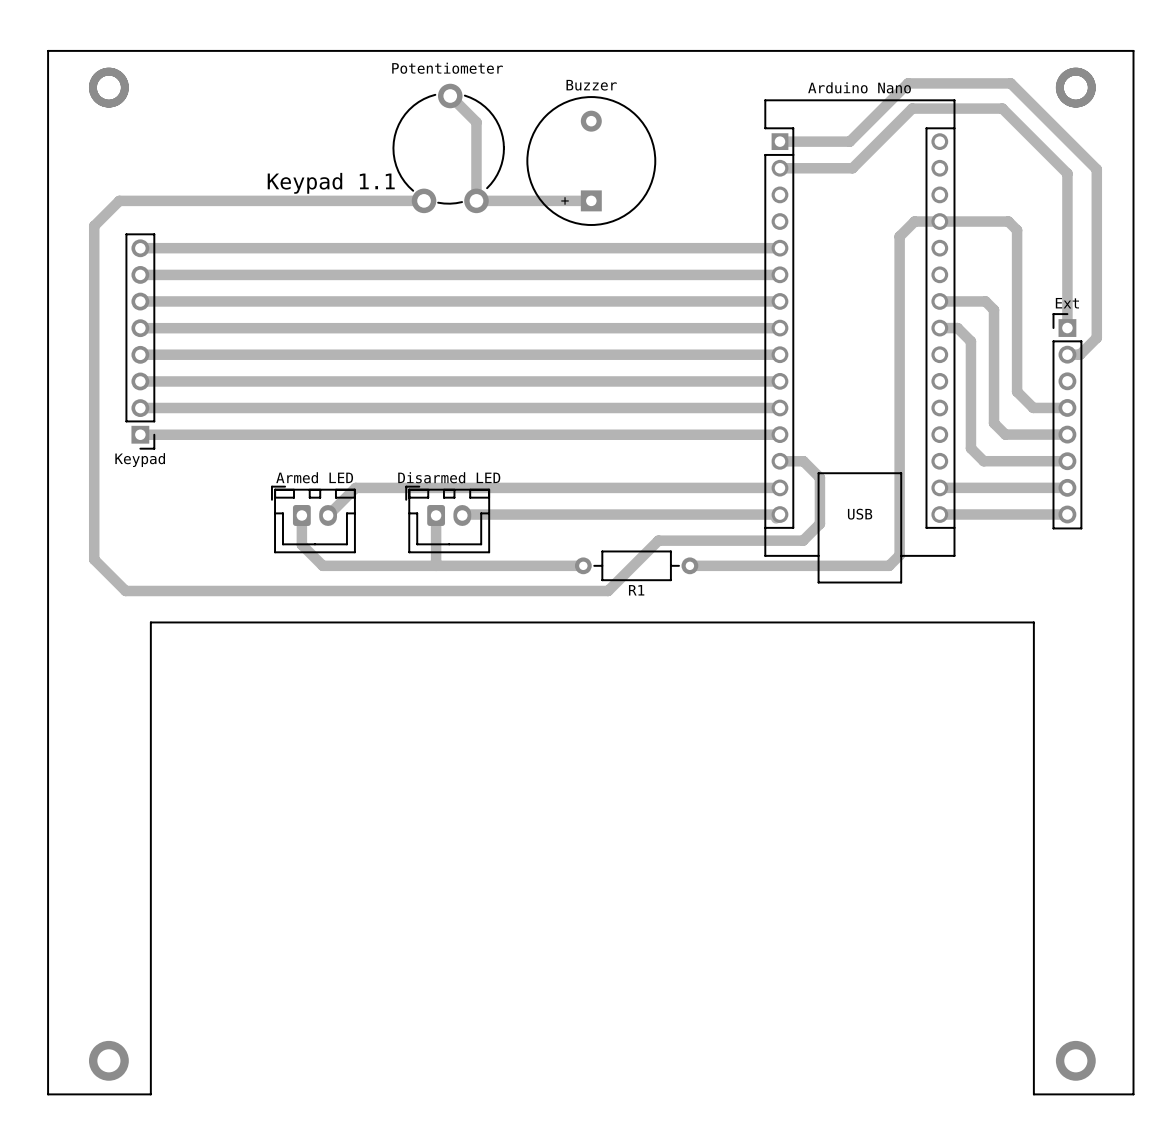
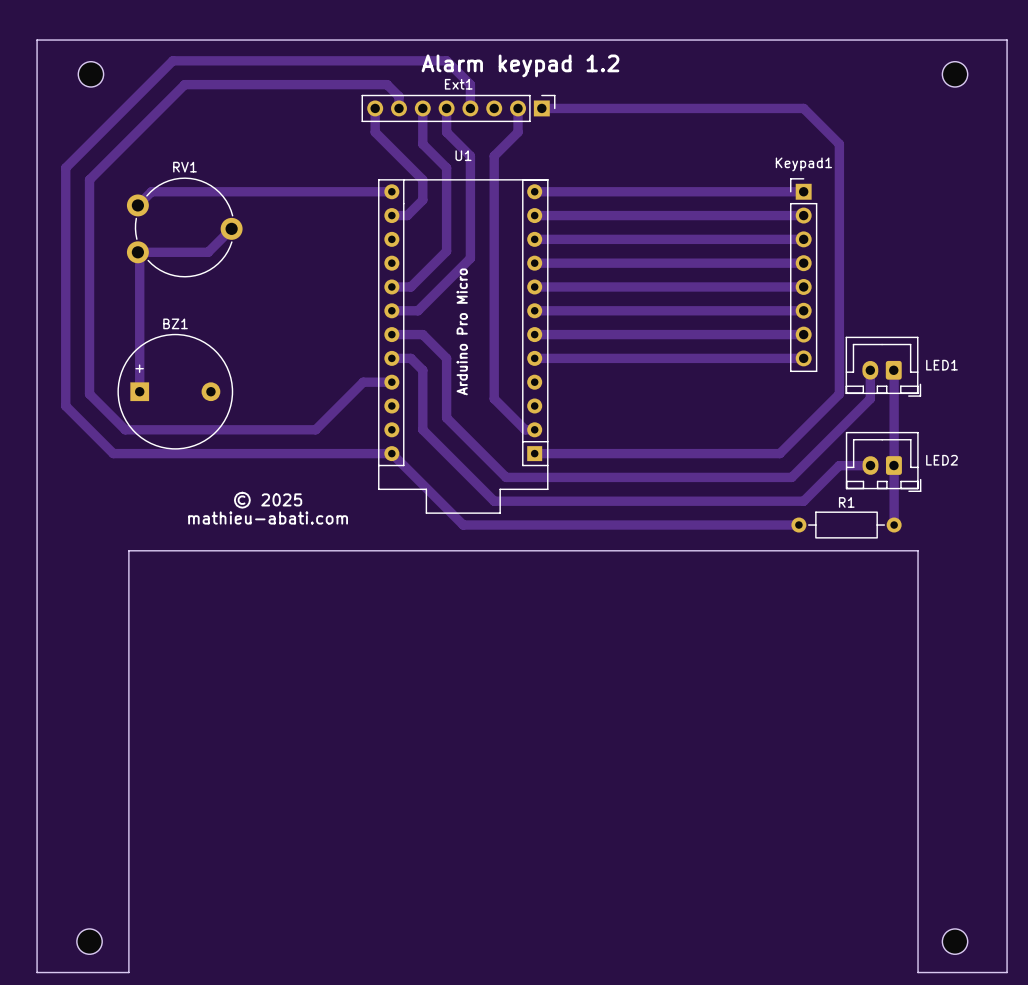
part footprint: [88, 67, 129, 108] -> [78, 61, 104, 88]
part footprint: [1055, 67, 1096, 108] -> [942, 61, 968, 88]
text: none -> Alarm keypad 1.2 (520, 65)
track: (450, 96) (476, 122) (476, 200) (591, 200) -> none
track: none -> (375, 108) (375, 132) (422, 179) (422, 200) (407, 215) (391, 215)
track: none -> (399, 108) (399, 96) (387, 84) (184, 84) (89, 179) (89, 394) (125, 429) (315, 429) (363, 382) (391, 382)
track: none -> (422, 108) (422, 144) (446, 167) (446, 251) (410, 286) (391, 286)
track: none -> (446, 108) (446, 132) (470, 156) (470, 258) (418, 310) (391, 310)
Ext1: none -> (458, 108)
track: none -> (470, 108) (470, 84) (446, 60) (172, 60) (65, 167) (65, 406) (113, 453) (391, 453) (463, 525) (798, 525)
track: none -> (518, 108) (518, 132) (494, 156) (494, 398) (525, 429) (534, 429)
track: none -> (541, 108) (803, 108) (839, 144) (839, 394) (779, 453) (534, 453)
track: (779, 141) (849, 141) (908, 83) (1010, 83) (1096, 169) (1096, 337) (1080, 354) (1067, 354) -> none
part: (448, 148) -> none
part: (591, 161) -> none
track: (779, 168) (852, 168) (912, 108) (1002, 108) (1067, 173) (1067, 328) -> none
text: Keypad 1.1 (331, 183) -> none
track: (424, 200) (119, 200) (94, 226) (94, 559) (125, 591) (608, 591) (658, 540) (803, 540) (819, 523) (819, 477) (803, 461) (779, 461) -> none
track: none -> (391, 191) (151, 191) (137, 205)
track: none -> (534, 191) (803, 191)
track: none -> (534, 215) (803, 215)
track: (140, 248) (779, 248) -> none
RV1: none -> (184, 227)
track: none -> (231, 228) (208, 252) (137, 252) (139, 254) (139, 391)
track: none -> (534, 239) (803, 239)
track: (140, 274) (779, 274) -> none
track: none -> (534, 263) (803, 263)
track: (140, 301) (779, 301) -> none
track: (939, 301) (985, 301) (994, 309) (994, 423) (1005, 434) (1067, 434) -> none
Keypad1: none -> (803, 275)
track: none -> (534, 286) (803, 286)
track: (140, 328) (779, 328) -> none
track: (939, 328) (957, 328) (970, 341) (970, 448) (983, 461) (1067, 461) -> none
part: (140, 341) -> none
part: (859, 341) -> none
track: none -> (534, 310) (803, 310)
track: (140, 354) (779, 354) -> none
text: none -> Arduino Pro Micro (462, 331)
track: none -> (391, 334) (422, 334) (446, 358) (446, 417) (506, 477) (791, 477) (870, 398) (870, 370)
track: none -> (534, 334) (803, 334)
track: (140, 381) (779, 381) -> none
U1: none -> (463, 346)
track: none -> (391, 358) (410, 358) (422, 370) (422, 429) (494, 501) (803, 501) (839, 465) (870, 465)
track: none -> (534, 358) (803, 358)
track: (1067, 407) (1033, 407) (1017, 391) (1017, 230) (1008, 221) (914, 221) (899, 236) (899, 555) (889, 565) (689, 565) -> none
track: (140, 408) (779, 408) -> none
LED1: none -> (883, 366)
track: none -> (893, 370) (894, 525)
part: (1067, 421) -> none
track: (140, 434) (779, 434) -> none
BZ1: none -> (175, 391)
track: (779, 487) (355, 487) (328, 515) -> none
track: (939, 487) (1067, 487) -> none
track: (939, 514) (1067, 514) -> none
track: (301, 515) (301, 544) (322, 565) (583, 565) -> none
track: (436, 515) (436, 565) -> none
track: (462, 515) (779, 514) (776, 518) -> none
part: (313, 519) -> none
part: (447, 519) -> none
LED2: none -> (883, 461)
text: none -> © 2025 (268, 500)
R1 position: (636, 565) -> (846, 525)
text: none -> mathieu-abati.com (268, 518)
R1 name position: R1 (636, 590) -> R1 (846, 502)
part footprint: [88, 1040, 129, 1081] -> [76, 928, 103, 955]
part footprint: [1055, 1040, 1096, 1081] -> [942, 928, 968, 955]

